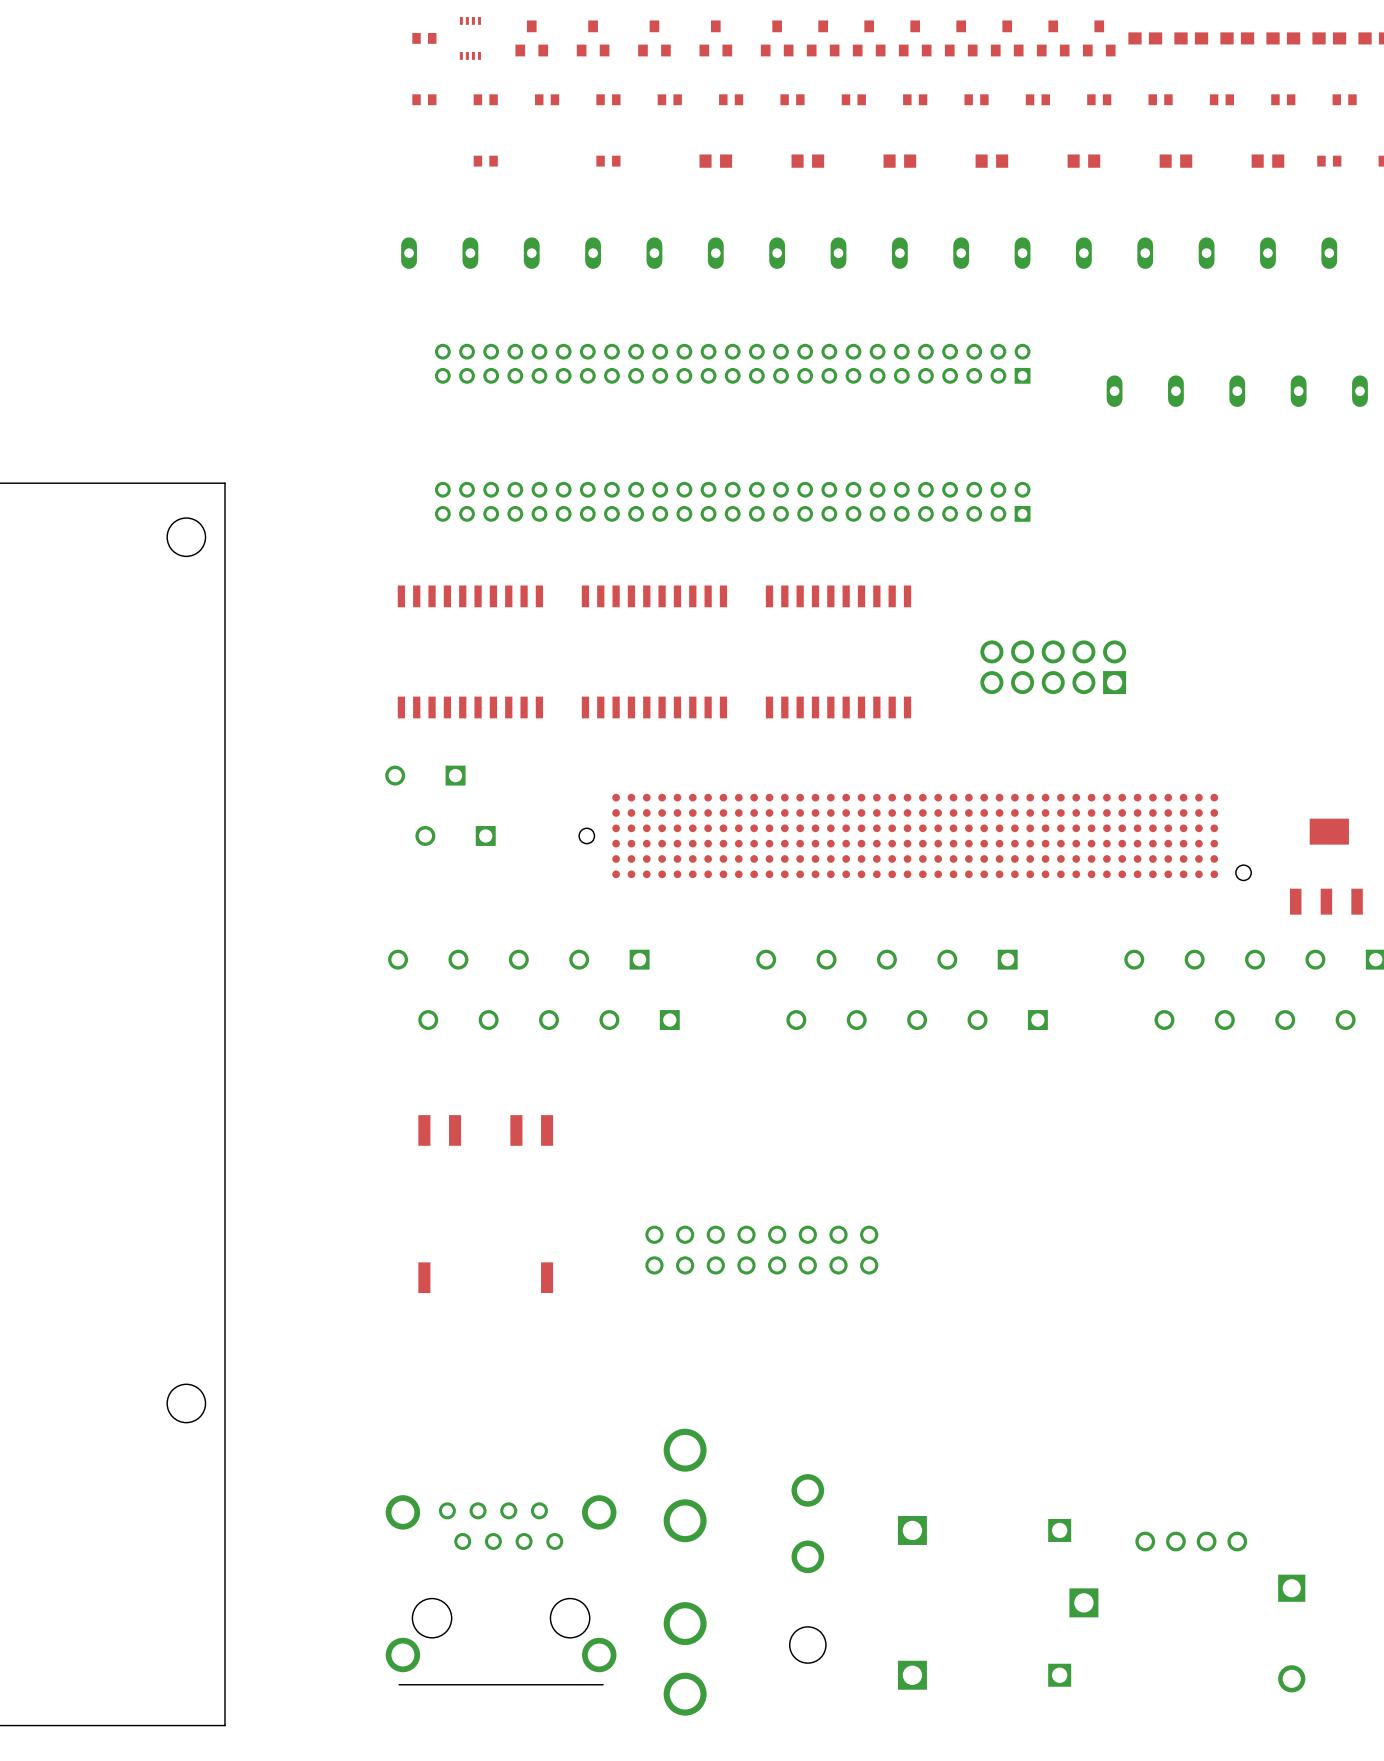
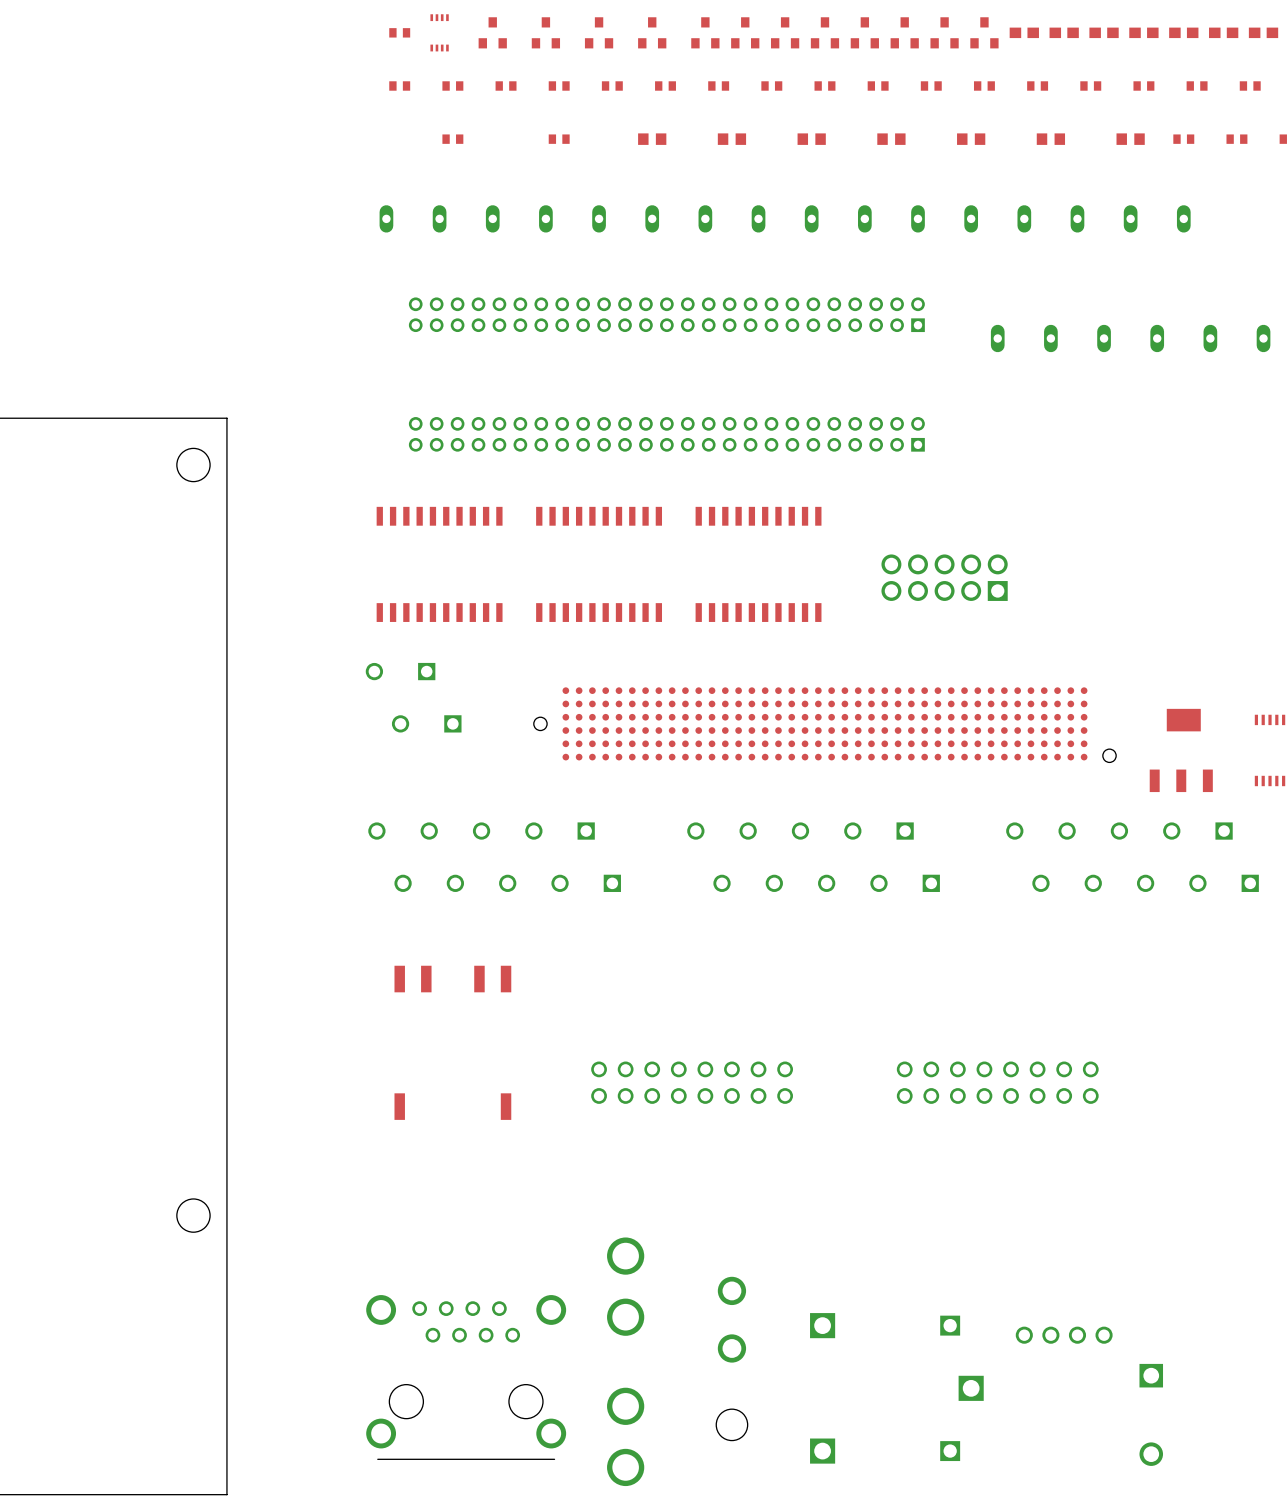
part: none -> (997, 1082)

